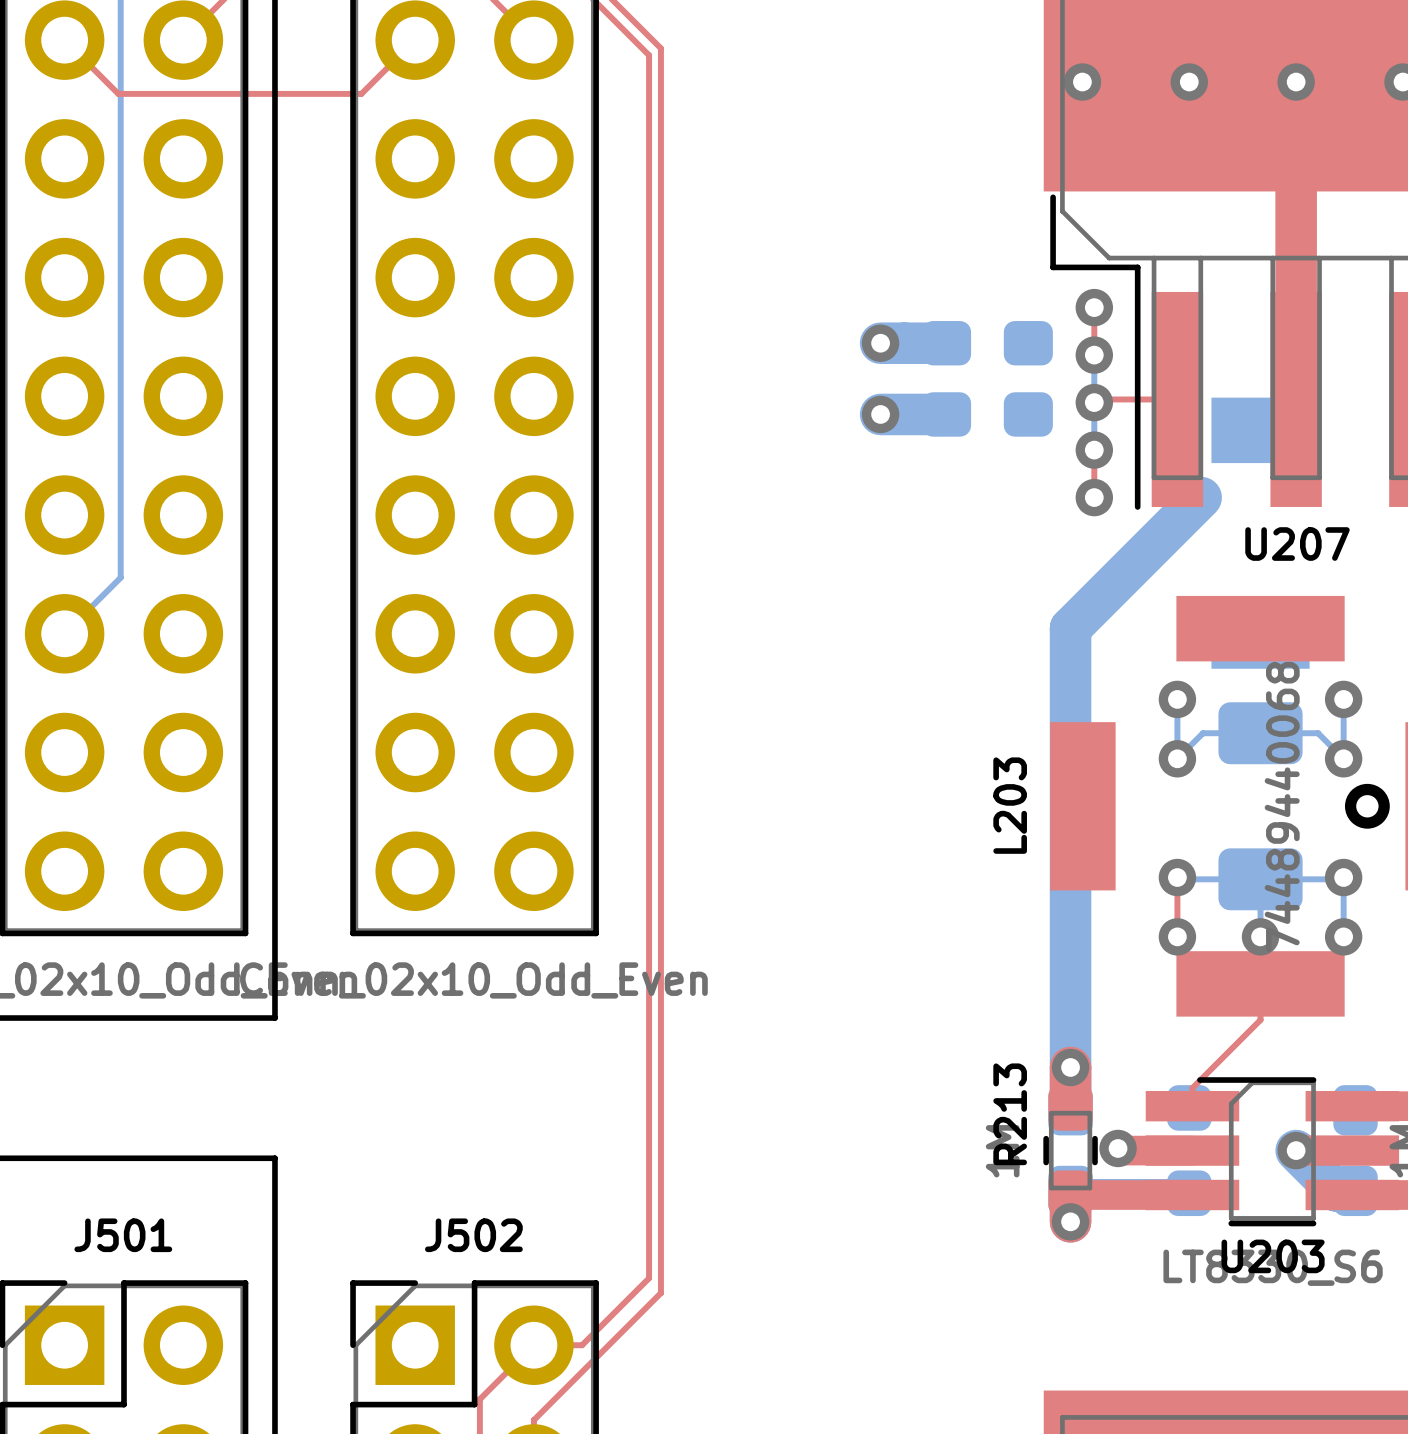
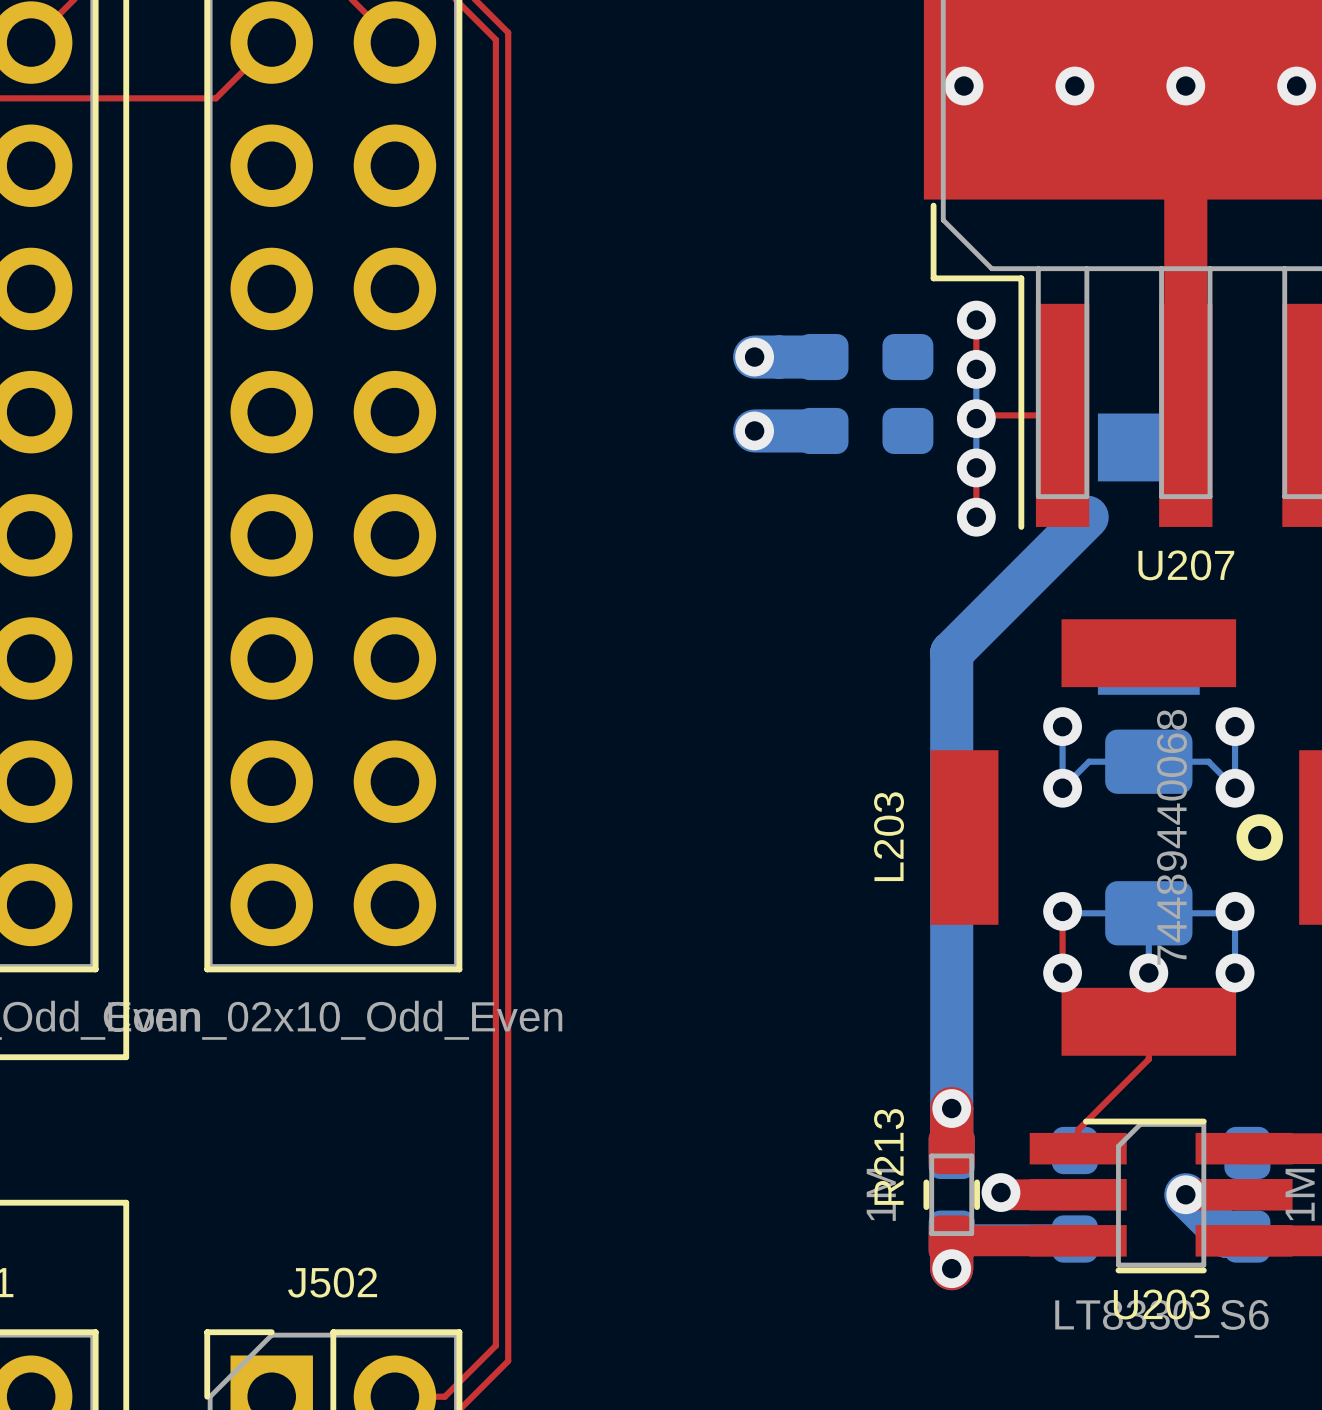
top track: (643, 30) (660, 48) (660, 1293) (643, 1310) -> (508, 32) (508, 1361)
top track: (631, 37) (649, 55) (649, 1278) (631, 1296) -> (495, 39) (495, 1345)

